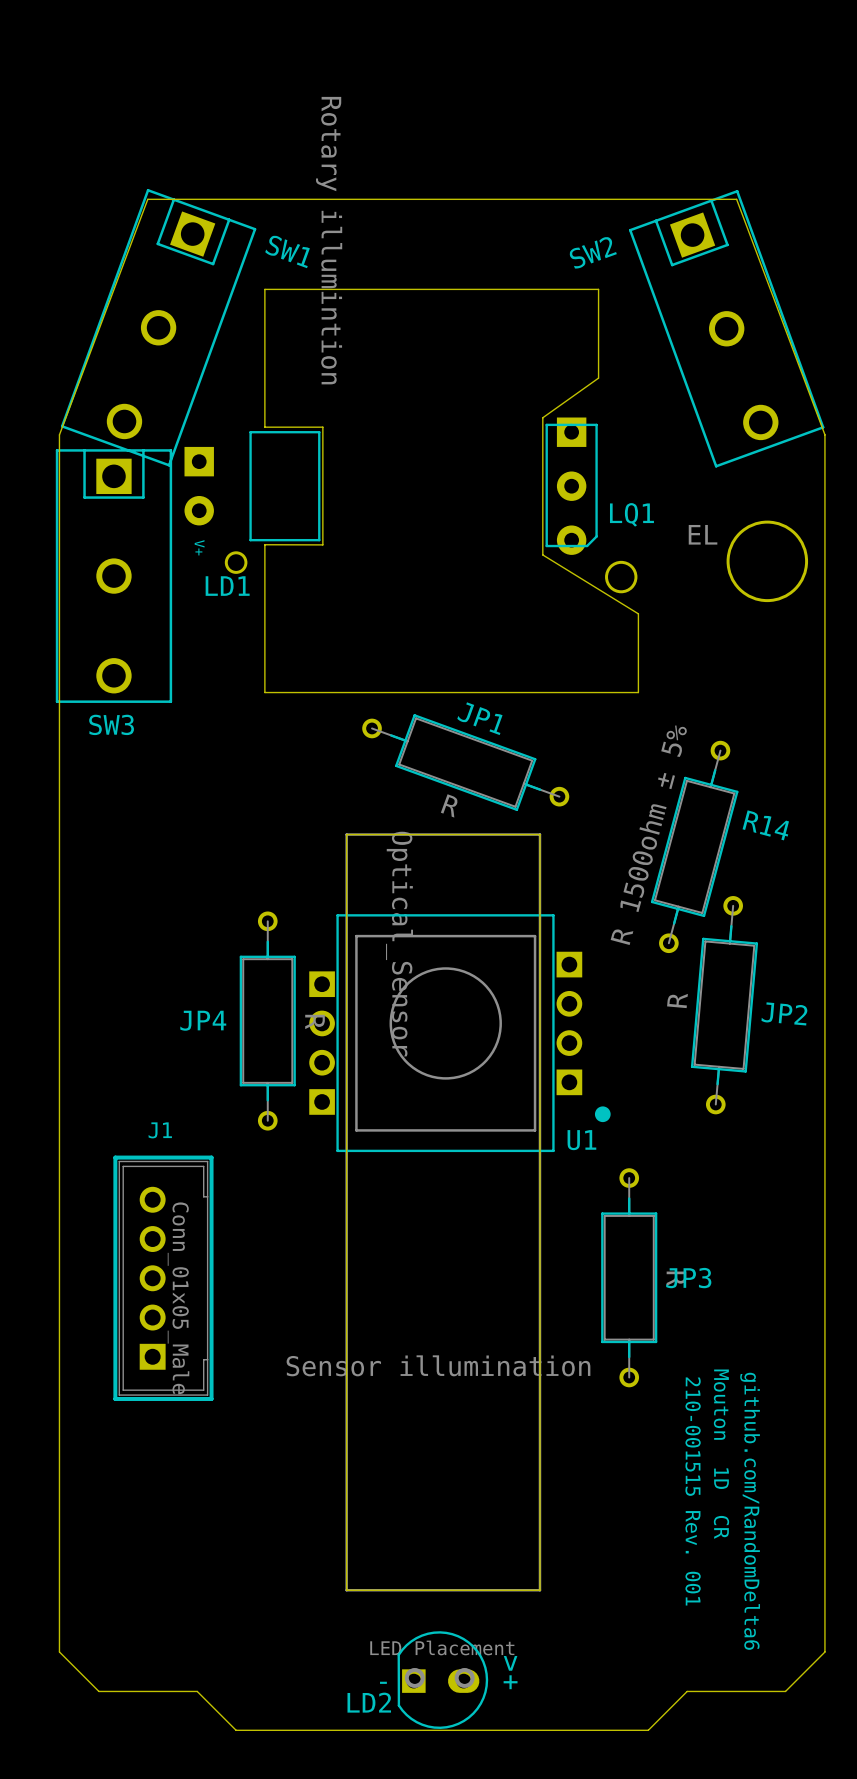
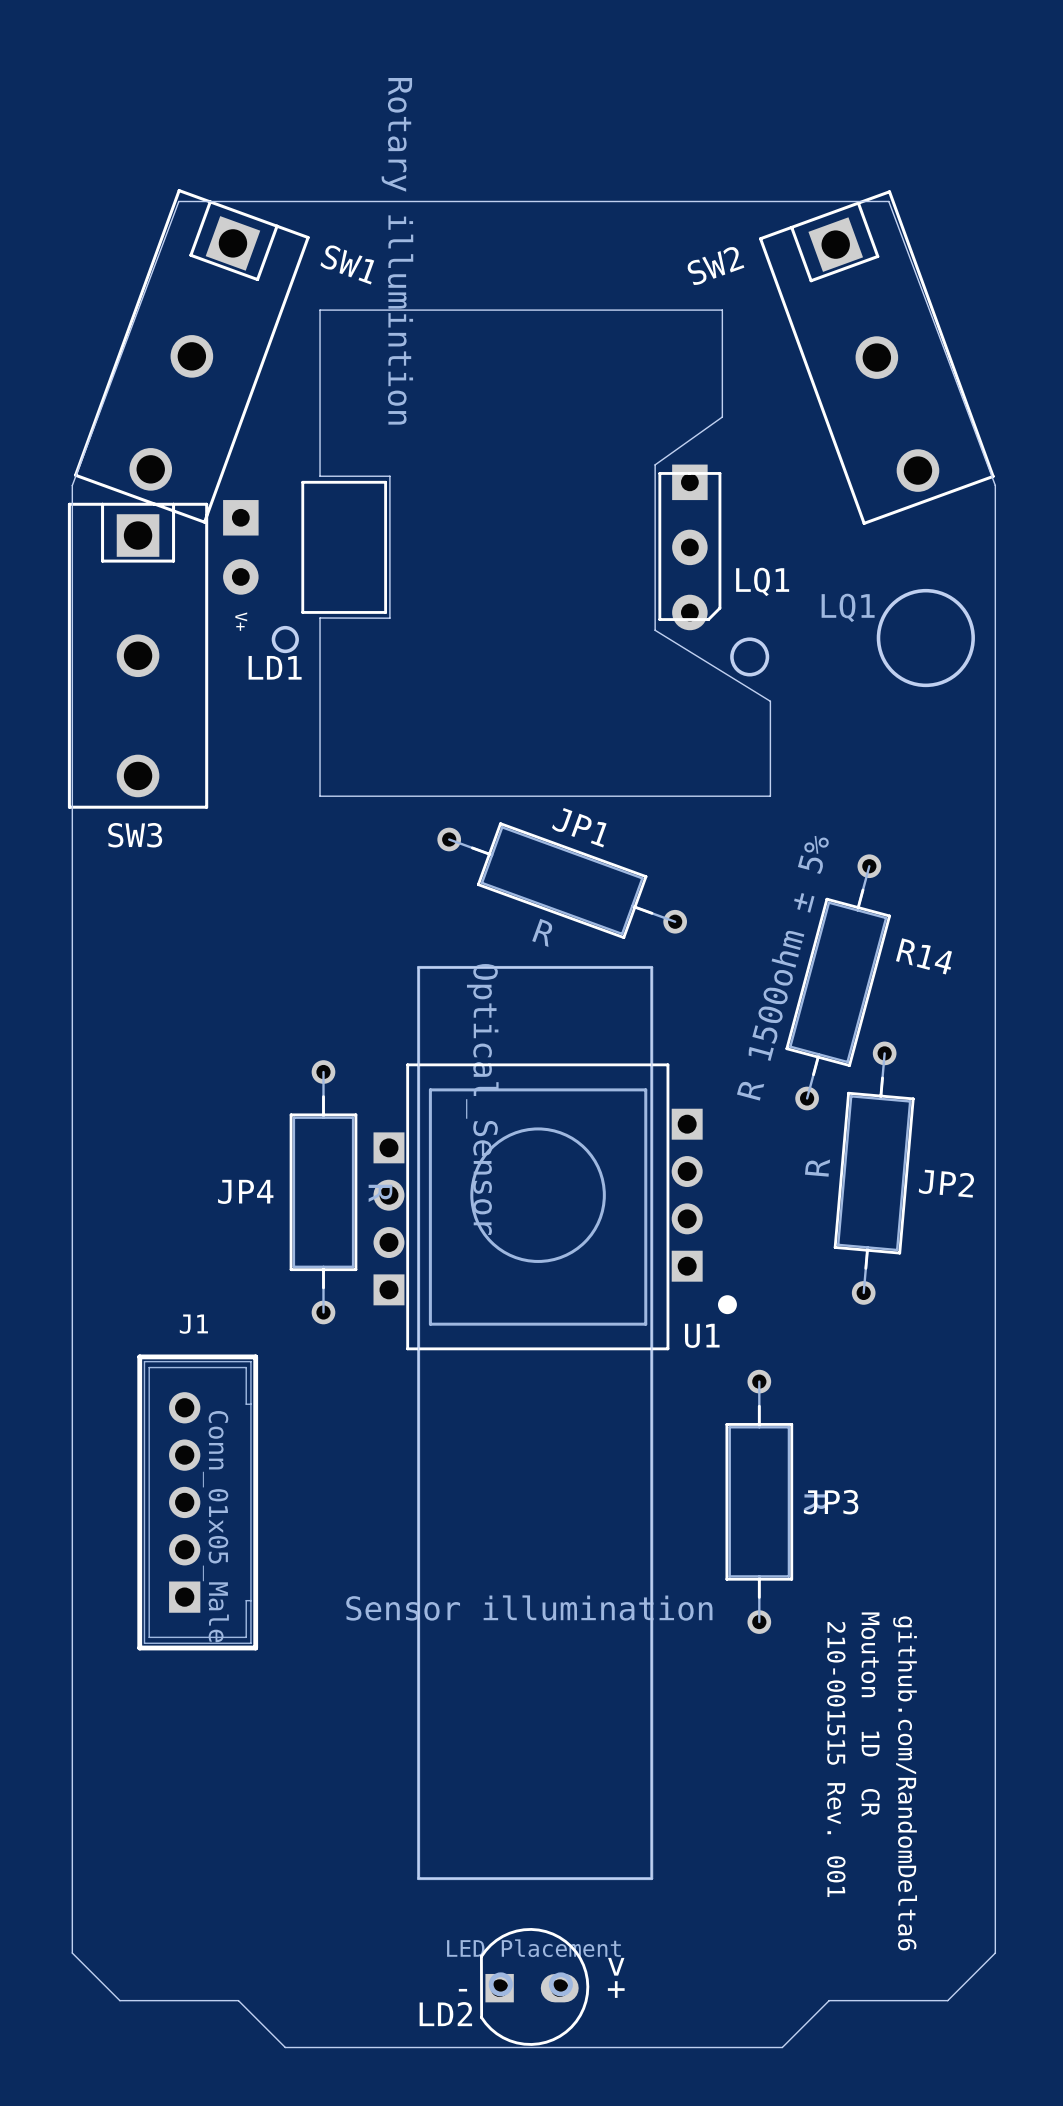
LQ1 value: EL (703, 534) -> LQ1 (848, 607)

